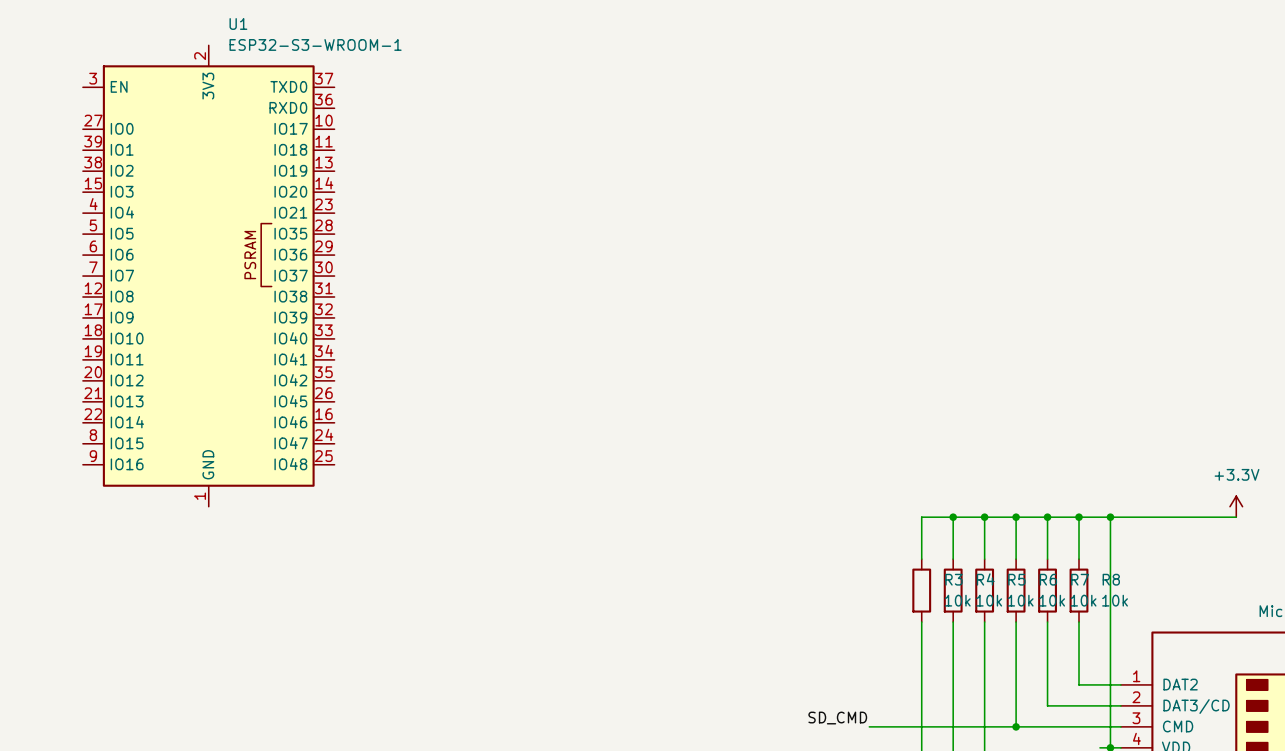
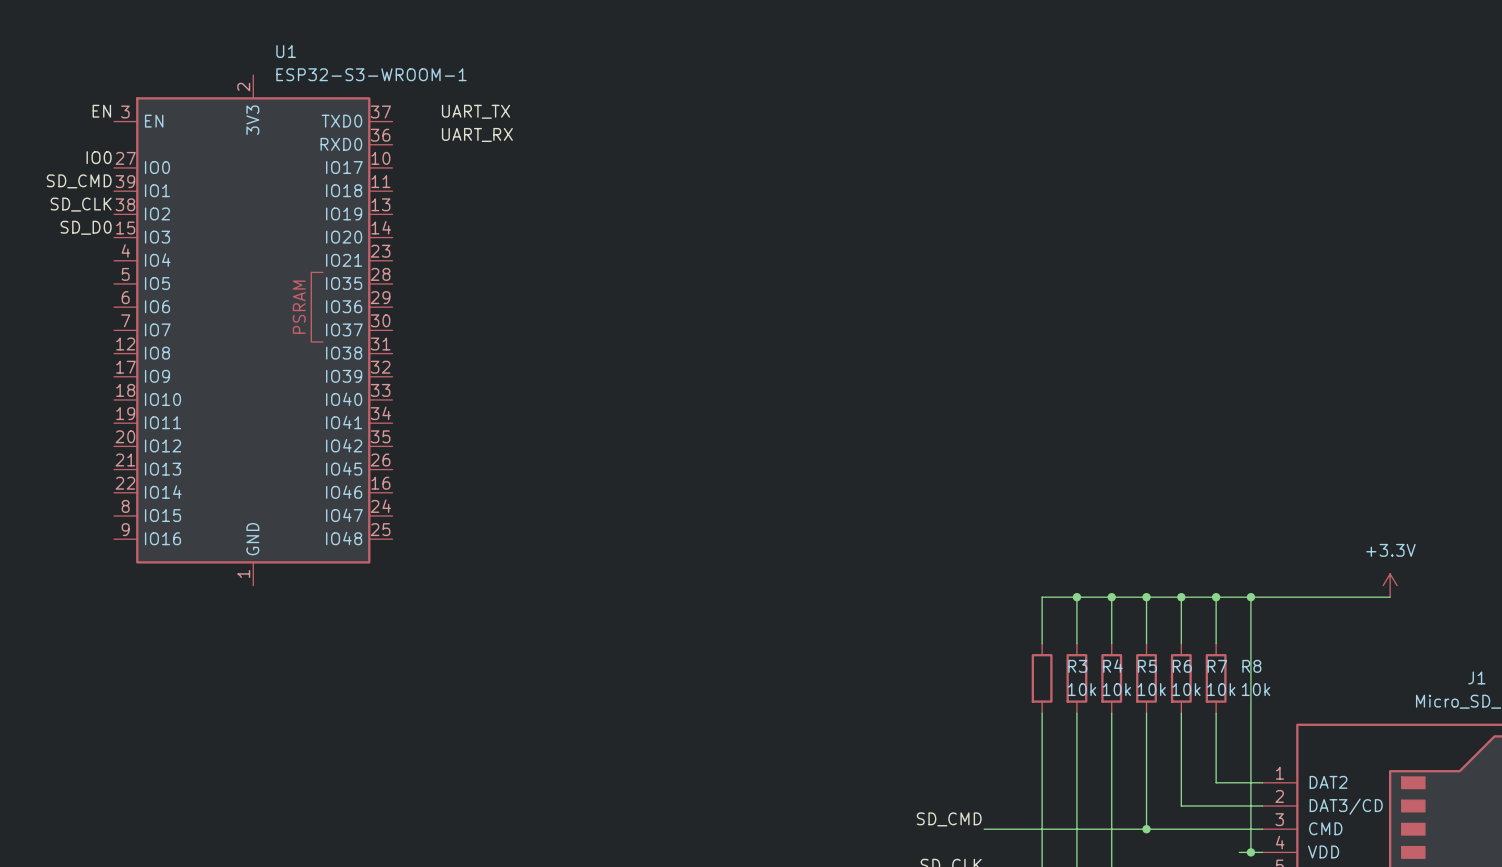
label: none -> EN (101, 111)
label: none -> UART_TX (475, 111)
label: none -> UART_RX (477, 134)
label: none -> IO0 (99, 157)
label: none -> SD_CMD (79, 181)
label: none -> SD_CLK (81, 204)
label: none -> SD_D0 (86, 227)

